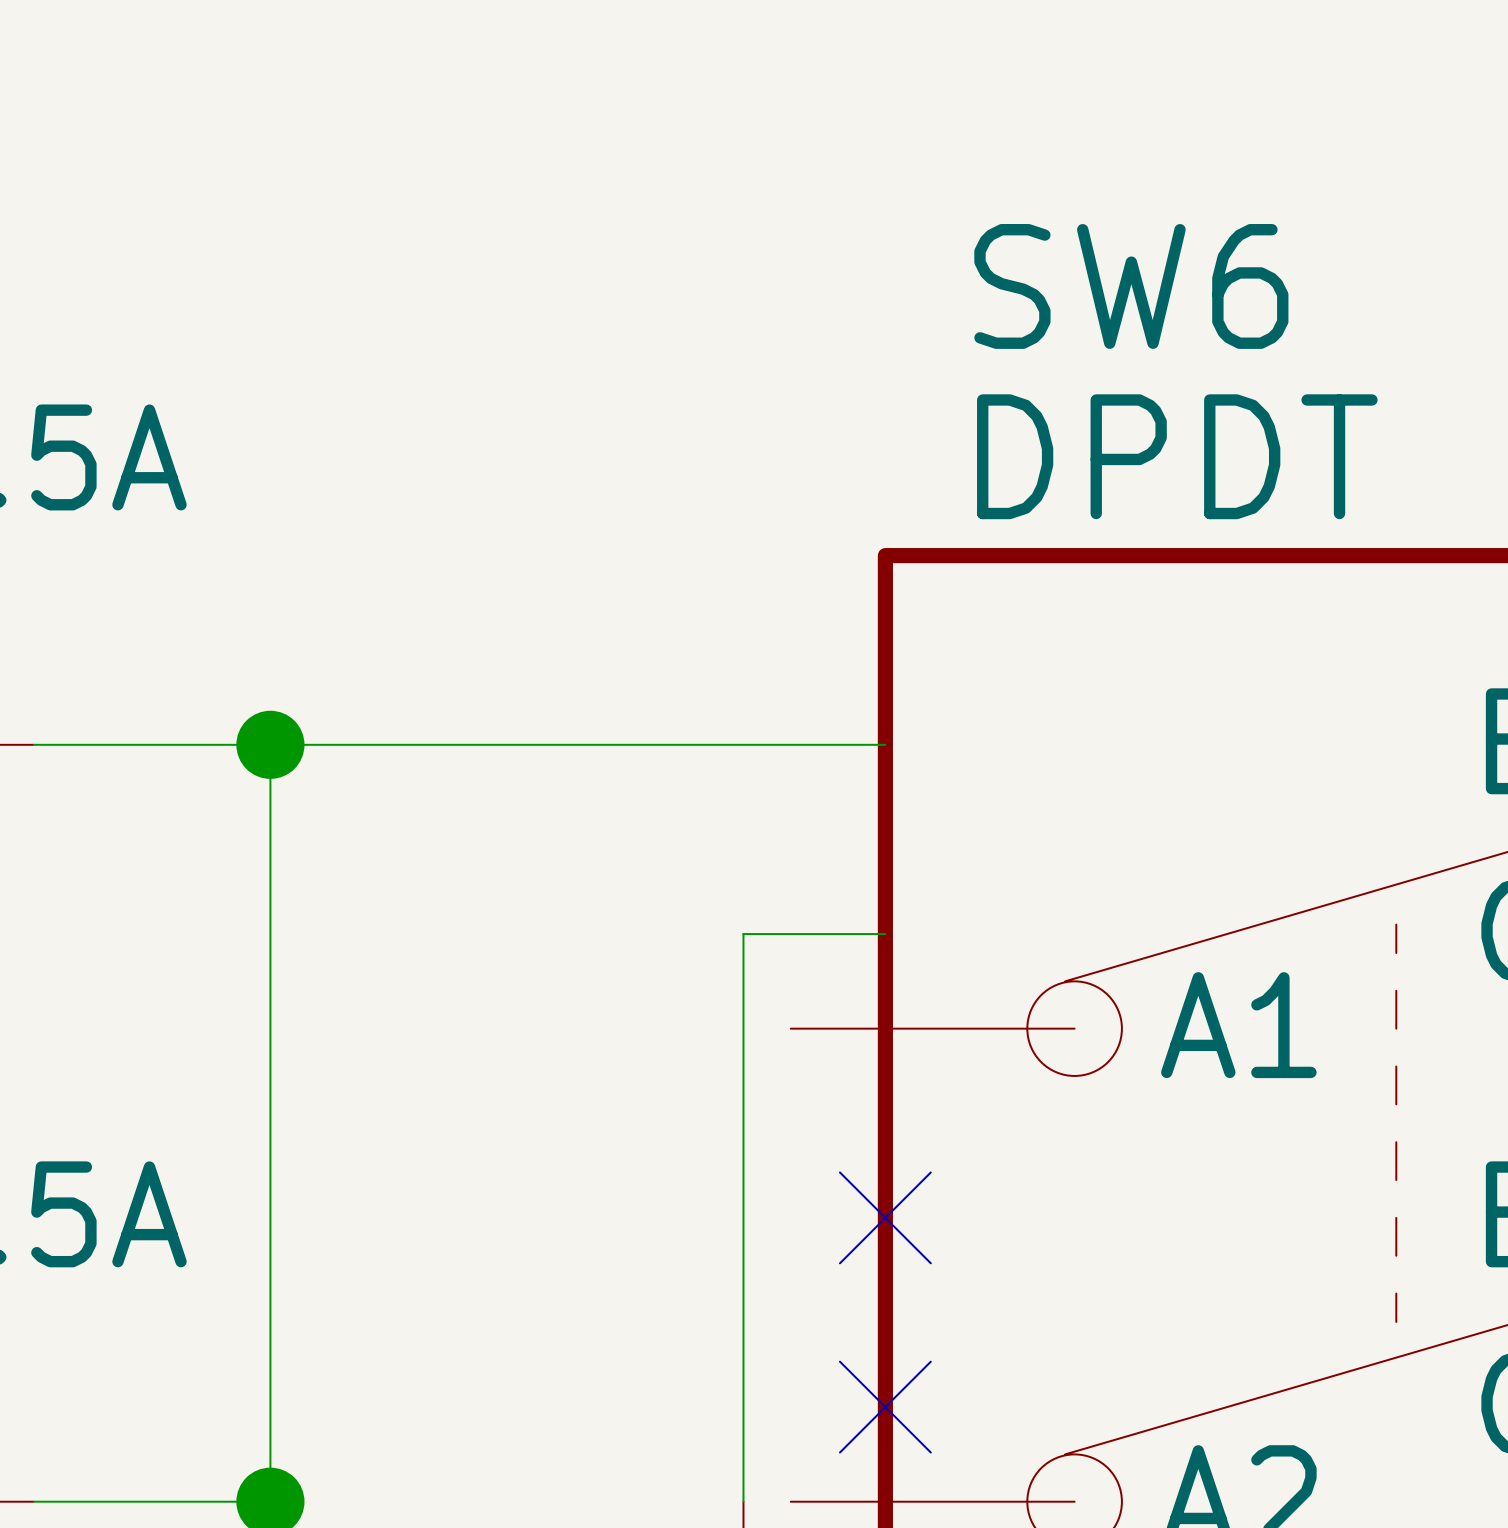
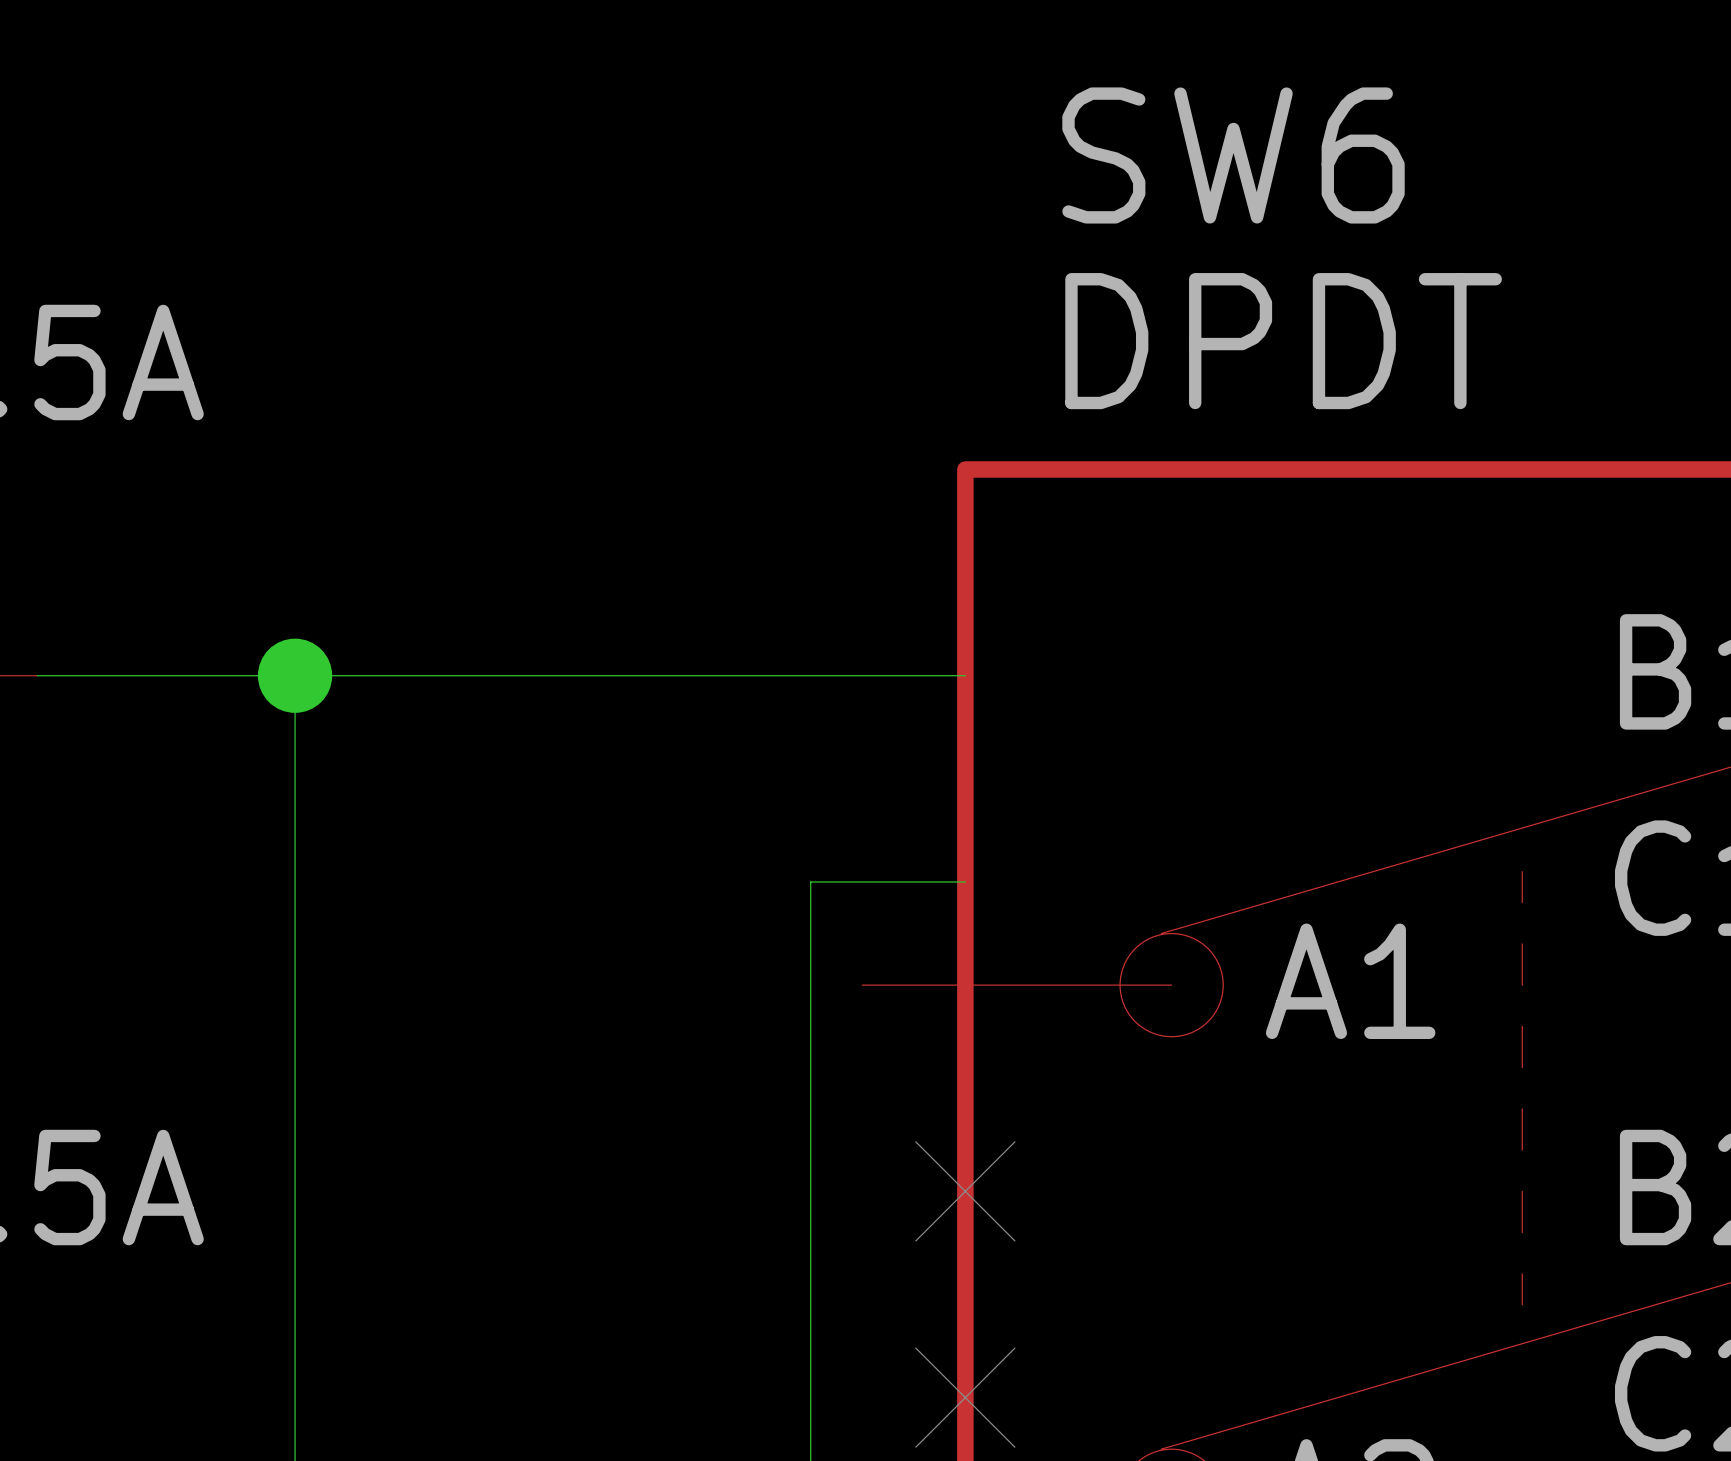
SW6 name position: SW6 (1131, 286) -> SW6 (1233, 155)
SW6 value position: DPDT (1177, 456) -> DPDT (1283, 341)

